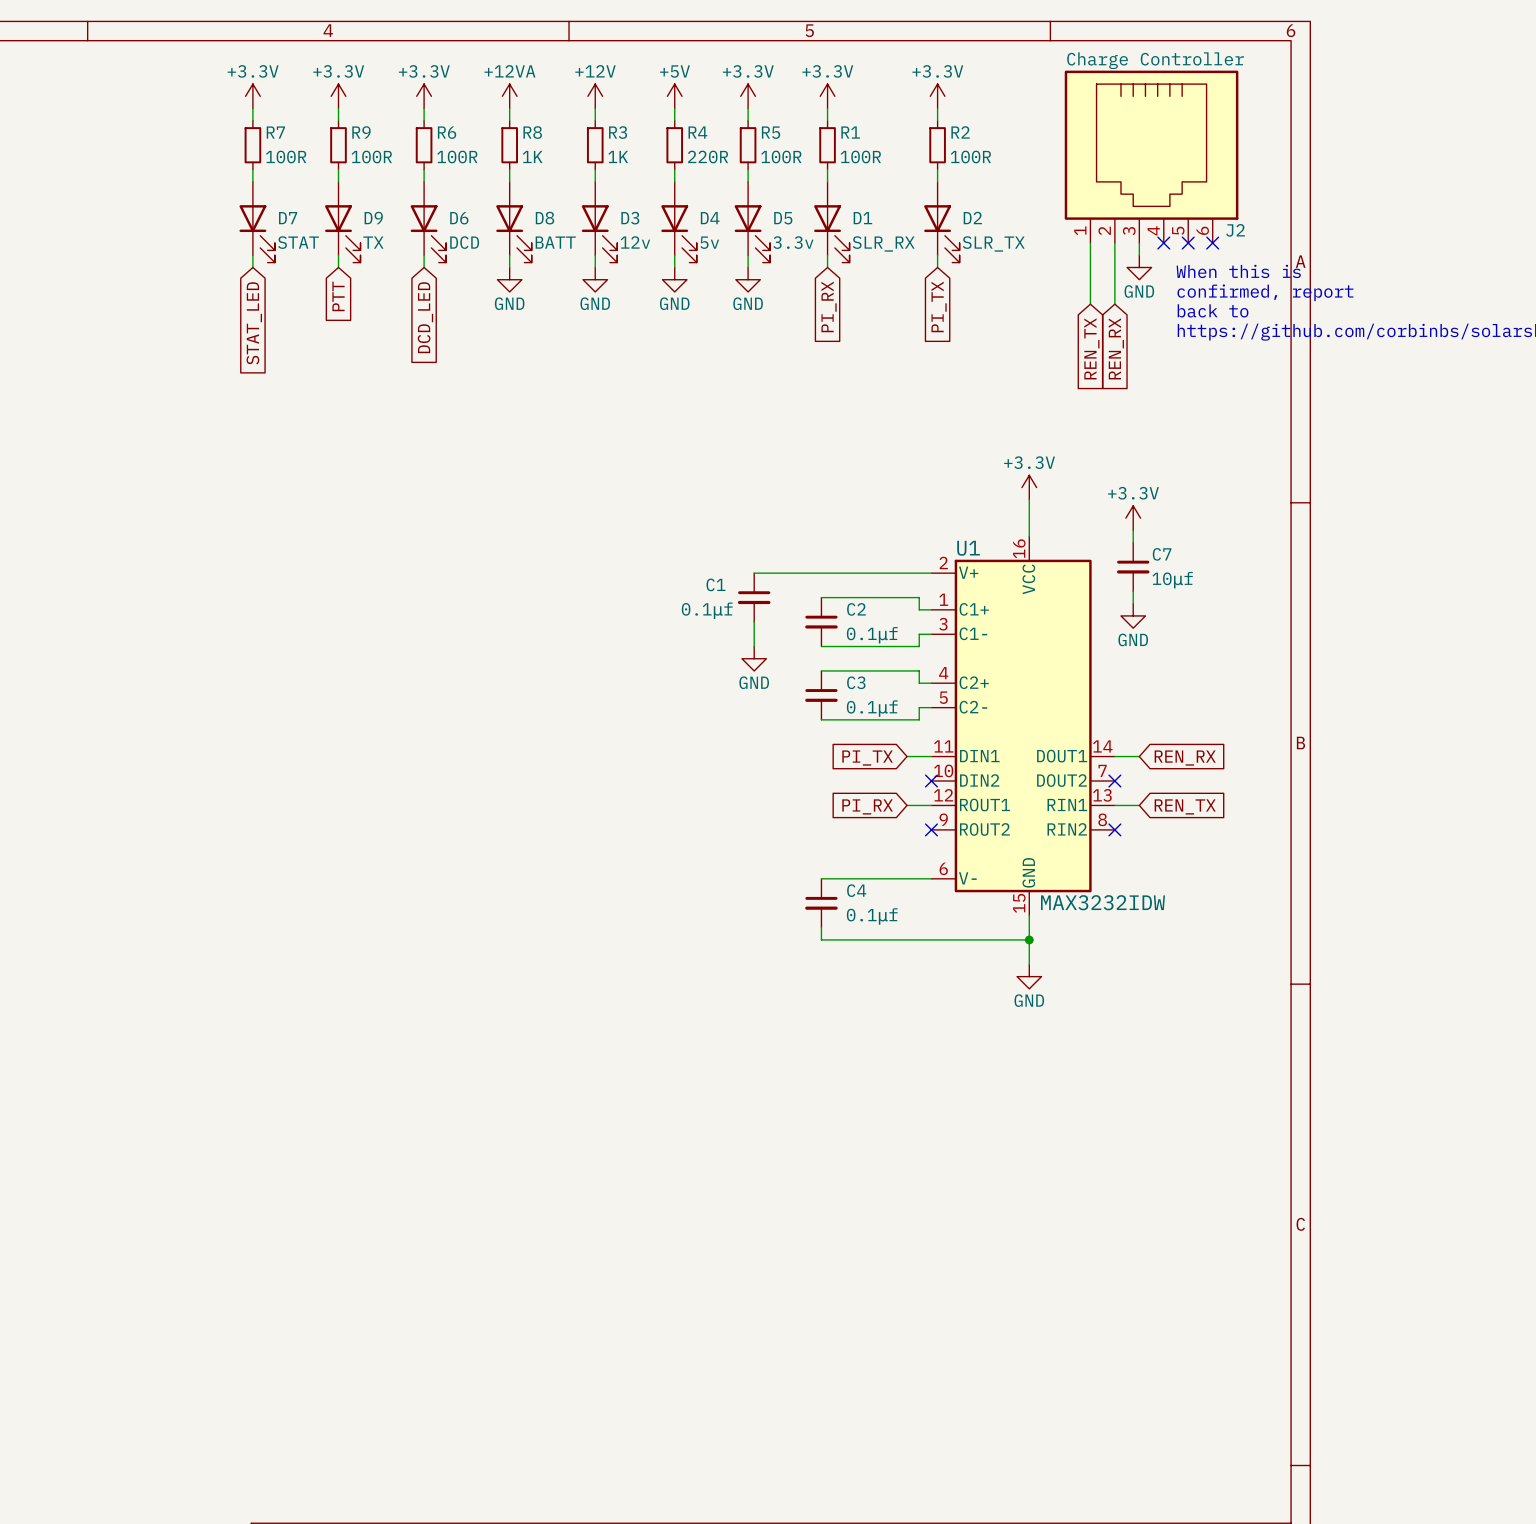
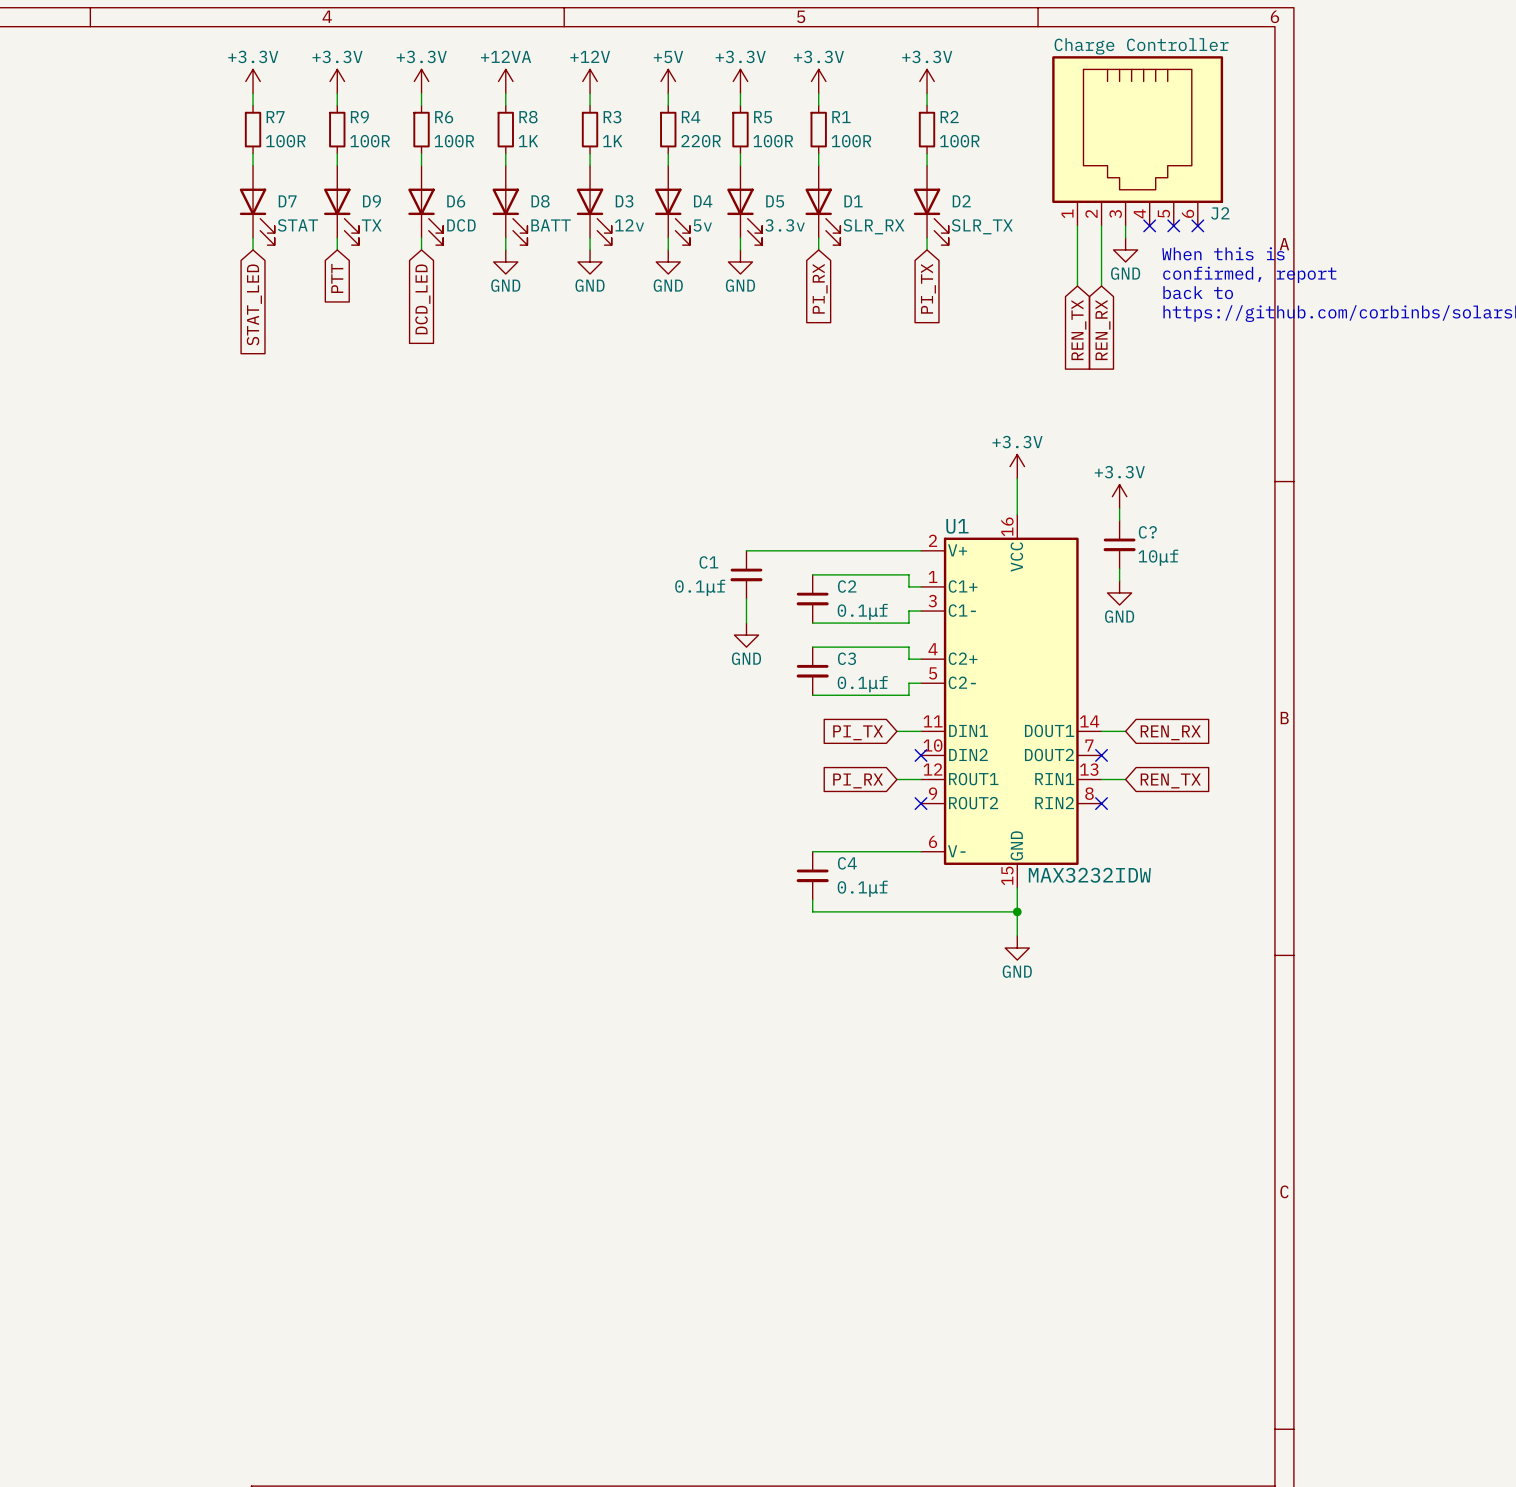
C7 name: C7 (1162, 554) -> C? (1147, 532)

